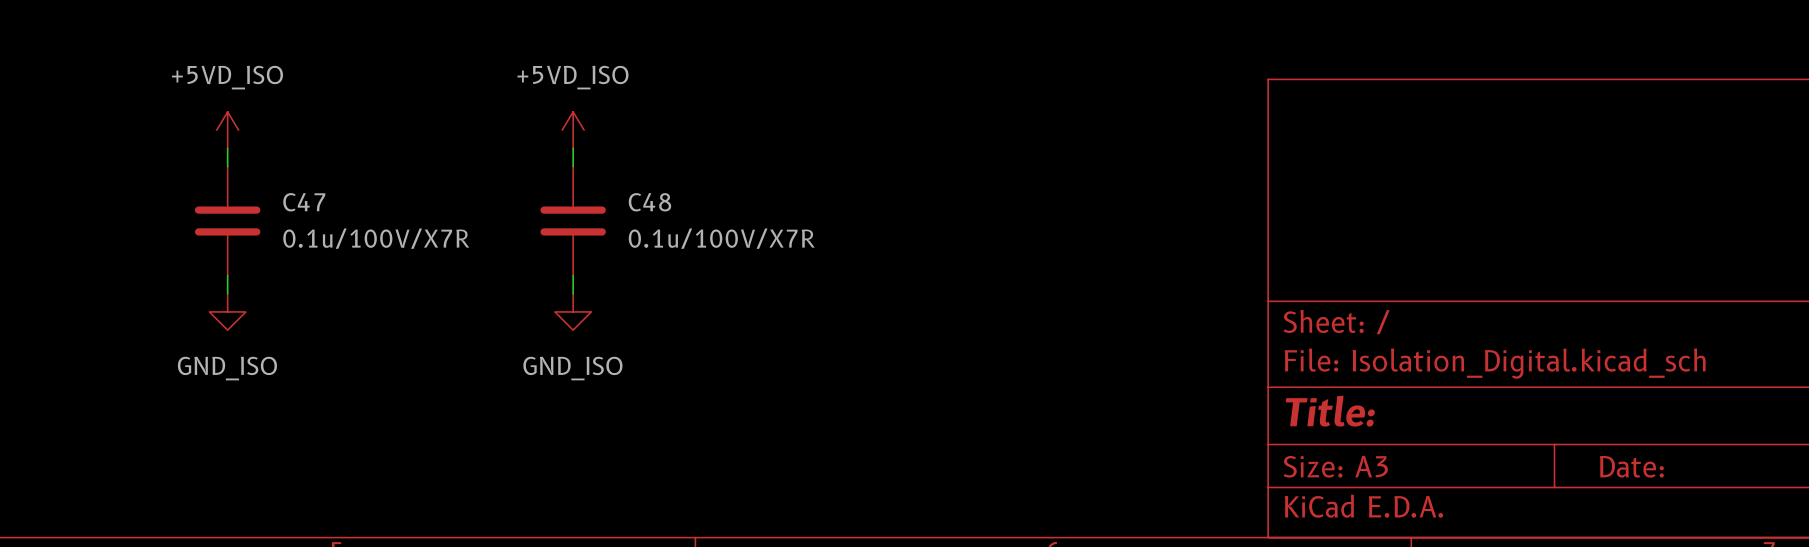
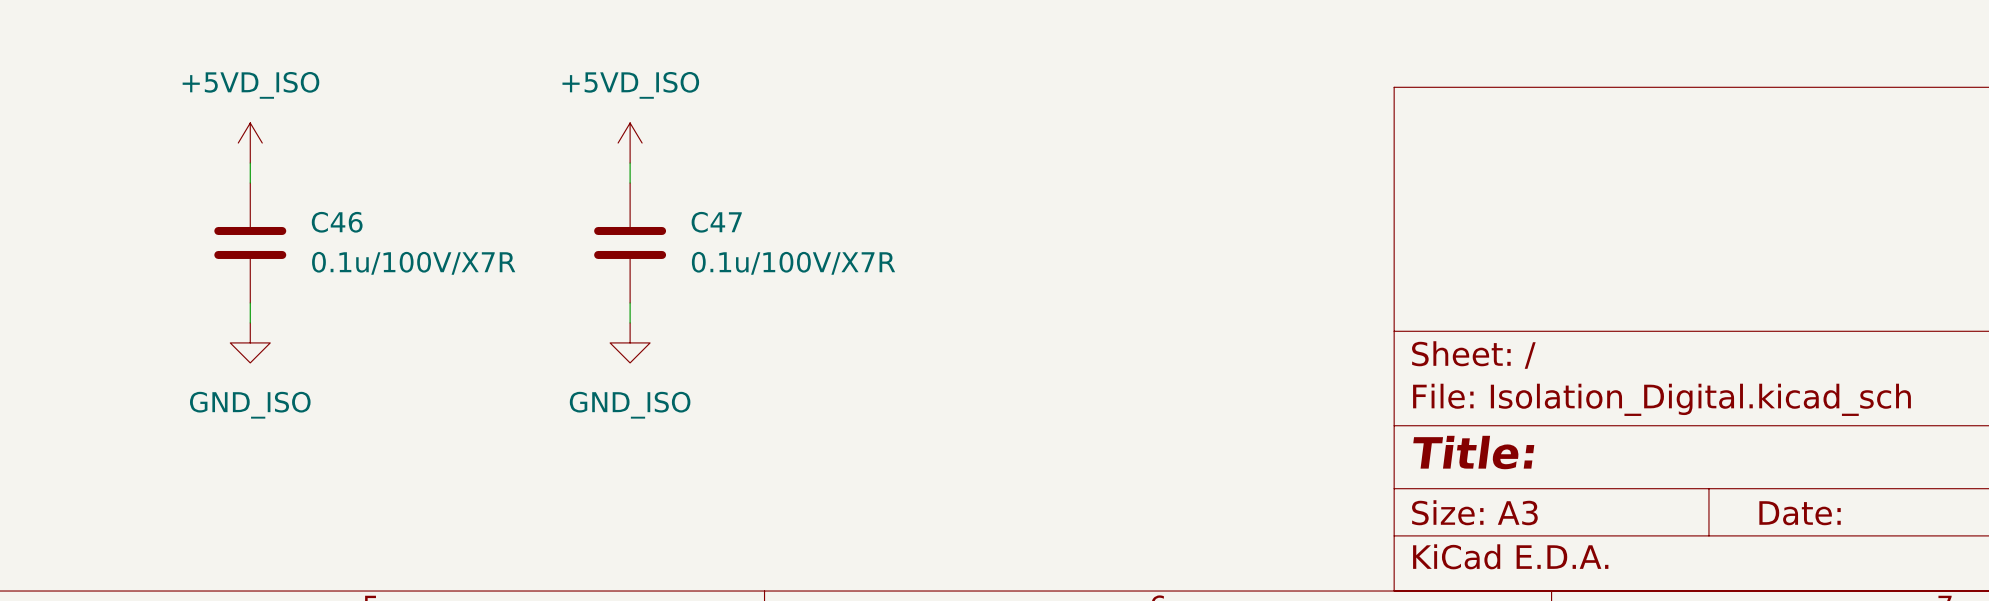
C47 name: C47 (304, 202) -> C46 (337, 222)
C48 name: C48 (649, 202) -> C47 (716, 222)

